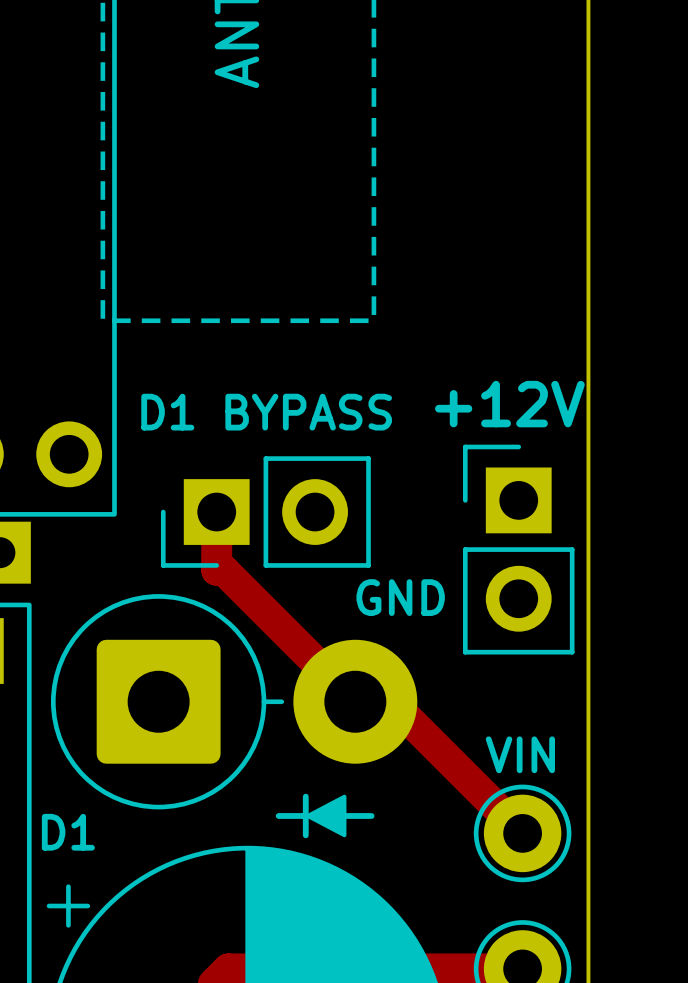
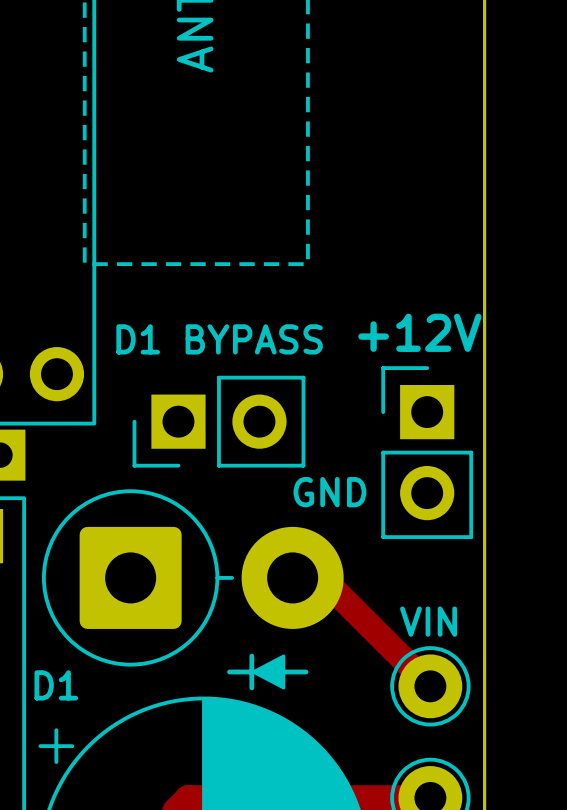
track: (216, 512) (216, 570) (223, 570) (355, 701) -> none

